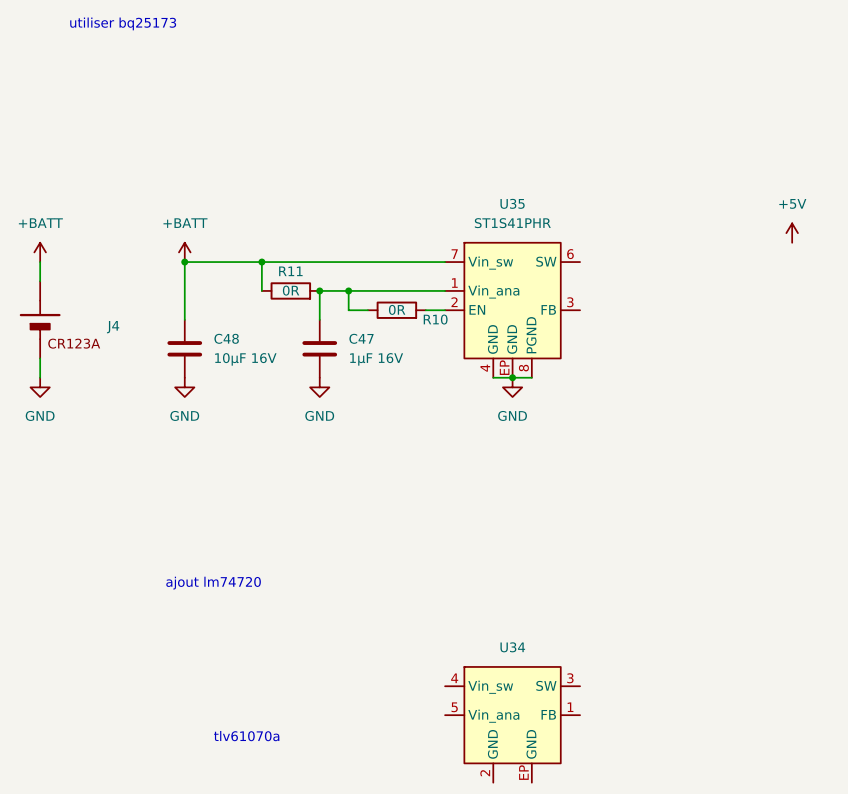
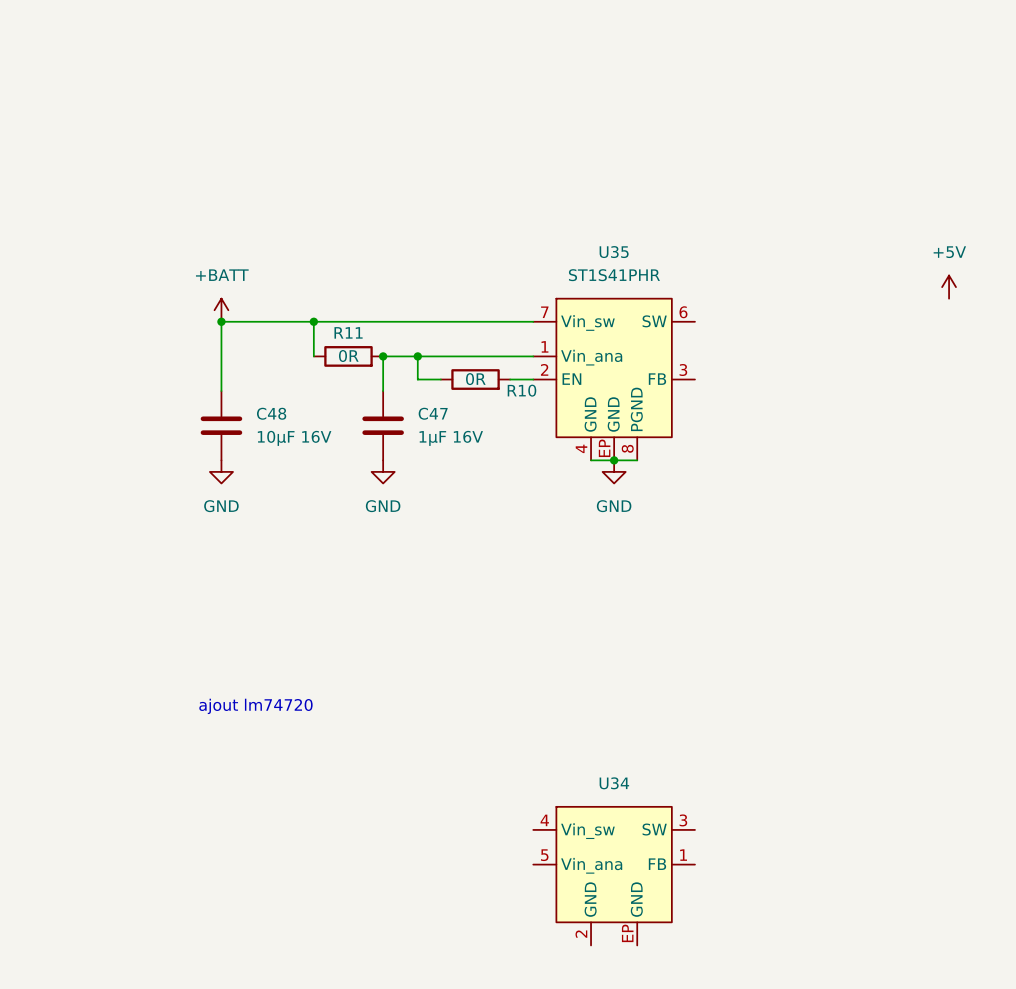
text: utiliser bq25173 (123, 23) -> none
power symbol: +BATT (40, 252) -> none
wire: (40, 262) (40, 281) -> none
J4: (40, 319) -> none
wire: (40, 358) (40, 377) -> none
power symbol: GND (40, 387) -> none
text: tlv61070a (246, 736) -> none

